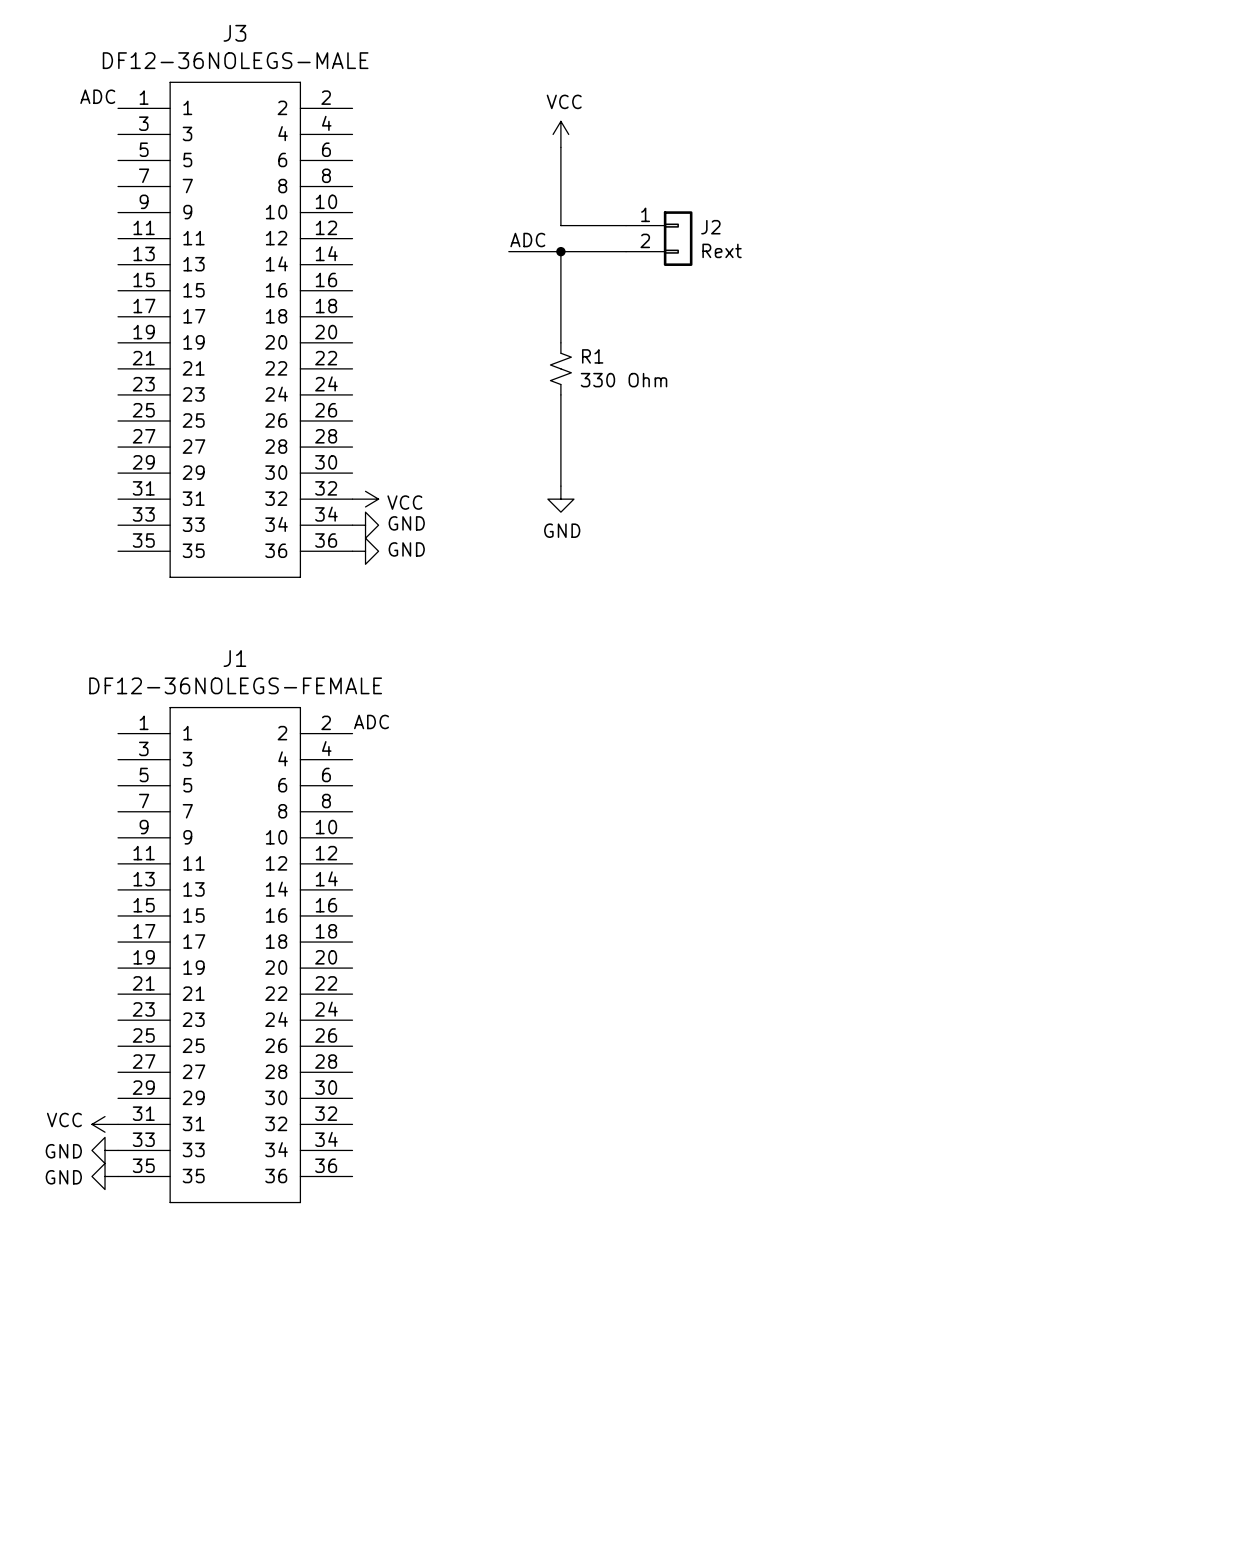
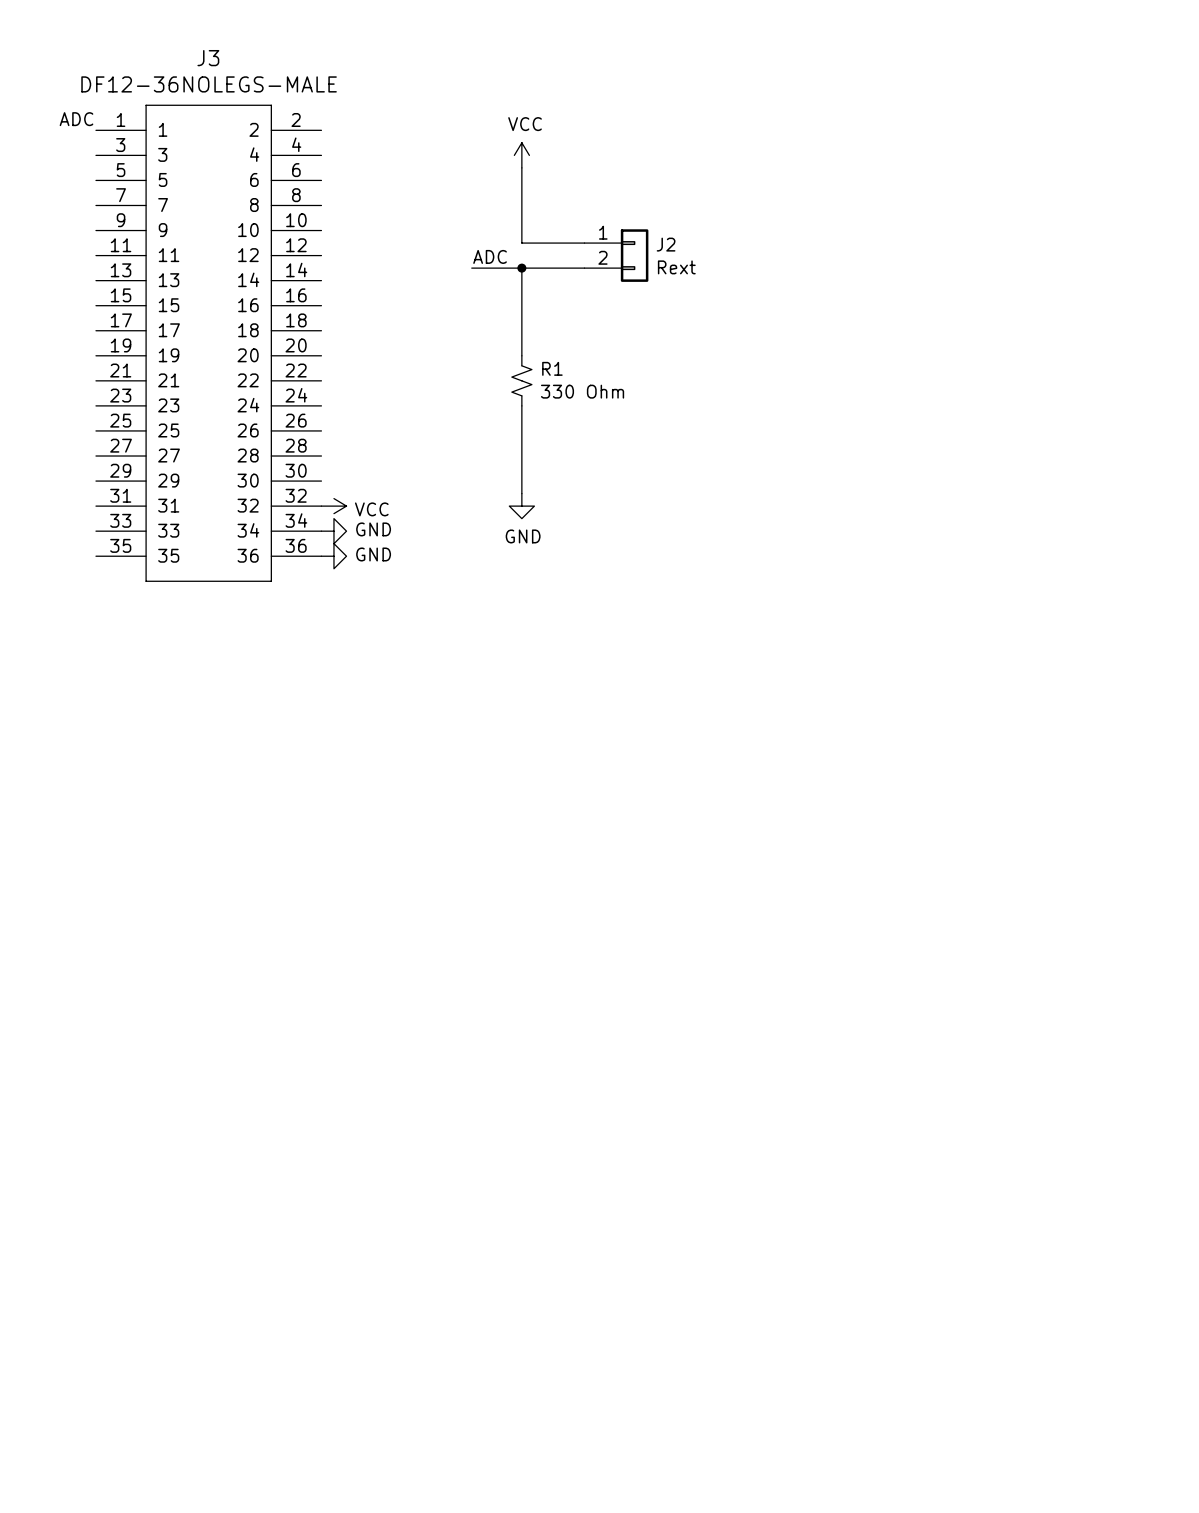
label: ADC (371, 721) -> none
J1: DF12-36NOLEGS-FEMALE (235, 955) -> none
power symbol: VCC (105, 1124) -> none
power symbol: GND (105, 1150) -> none
power symbol: GND (105, 1176) -> none

